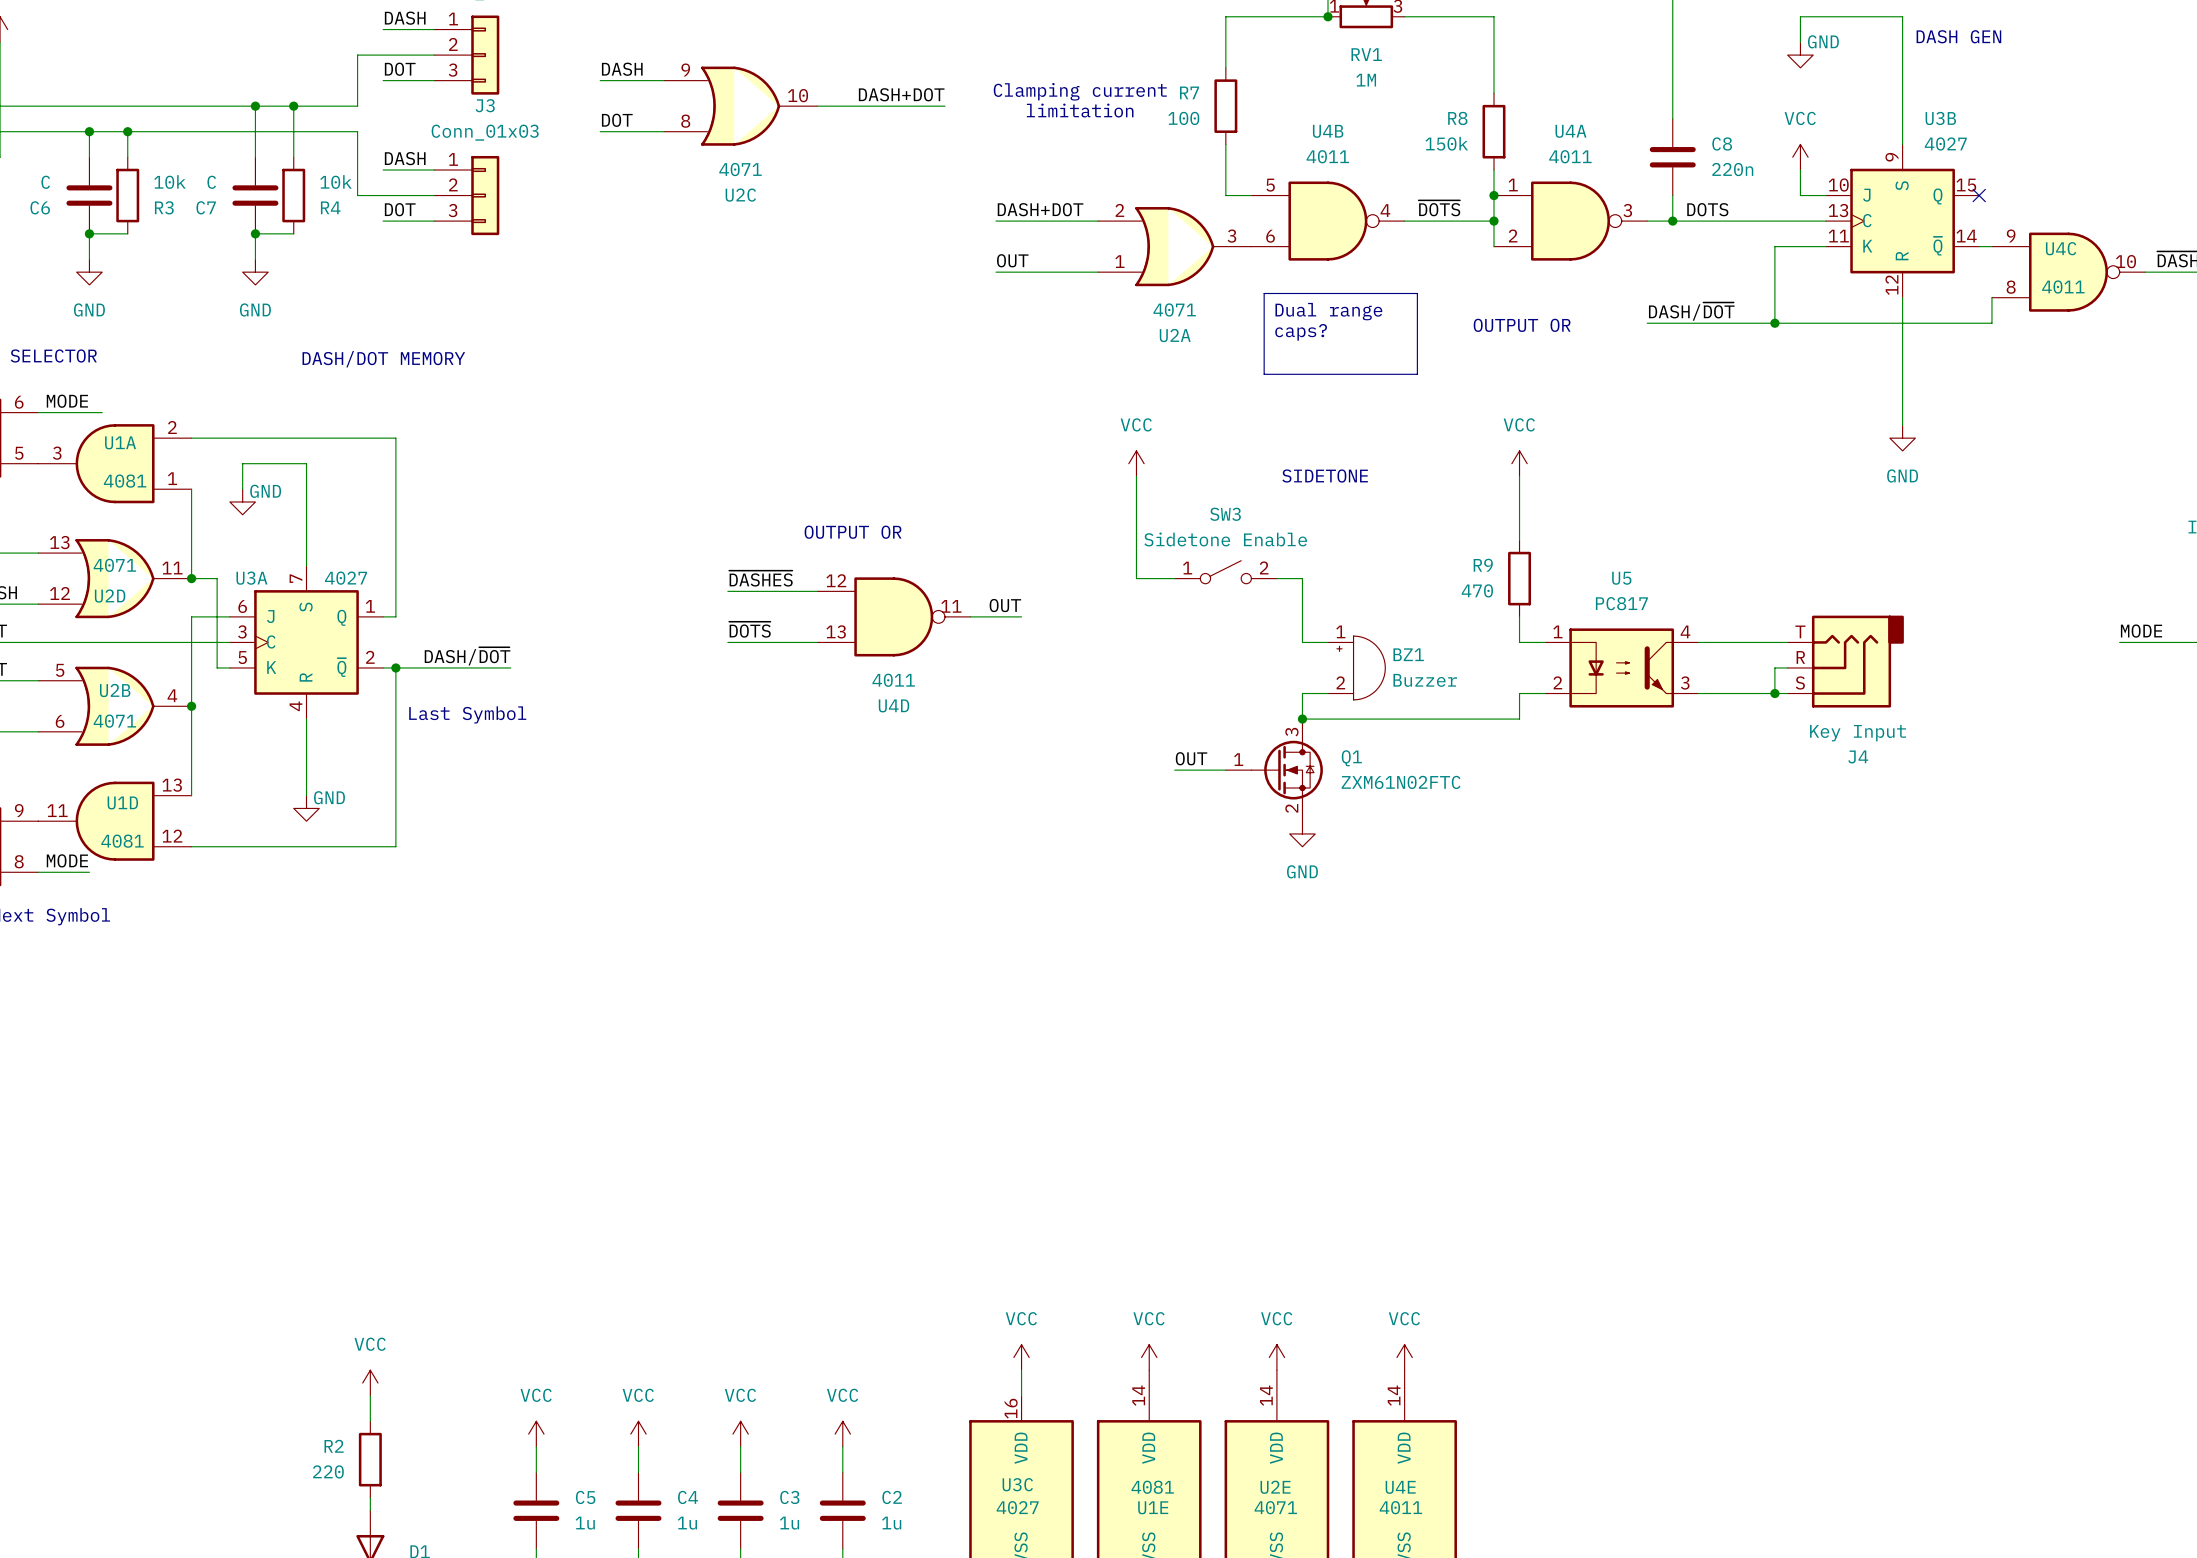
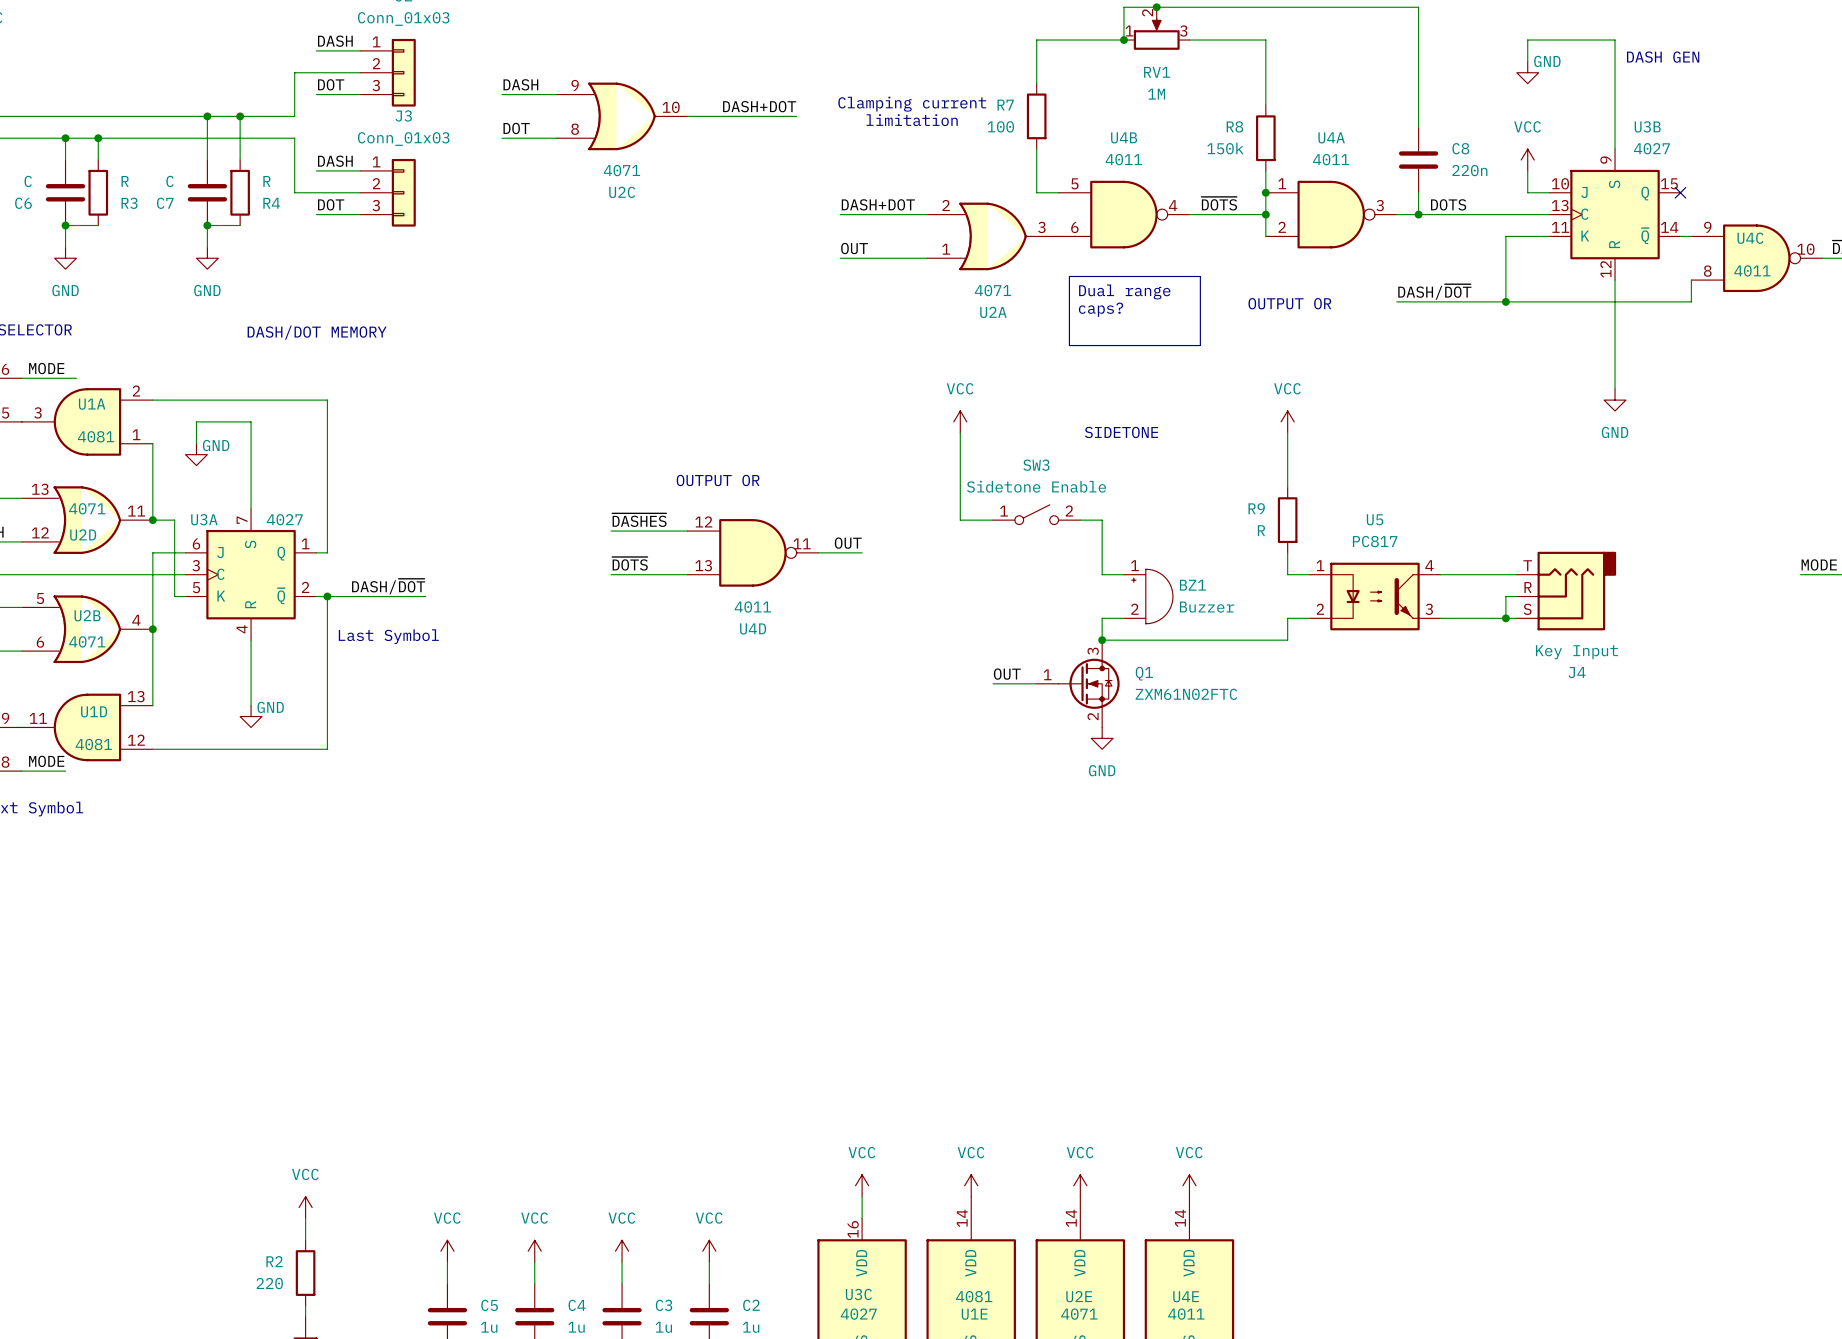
R3 value: 10k (169, 182) -> R (125, 181)
R4 value: 10k (335, 182) -> R (266, 181)
R9 value: 470 (1477, 590) -> R (1261, 530)

